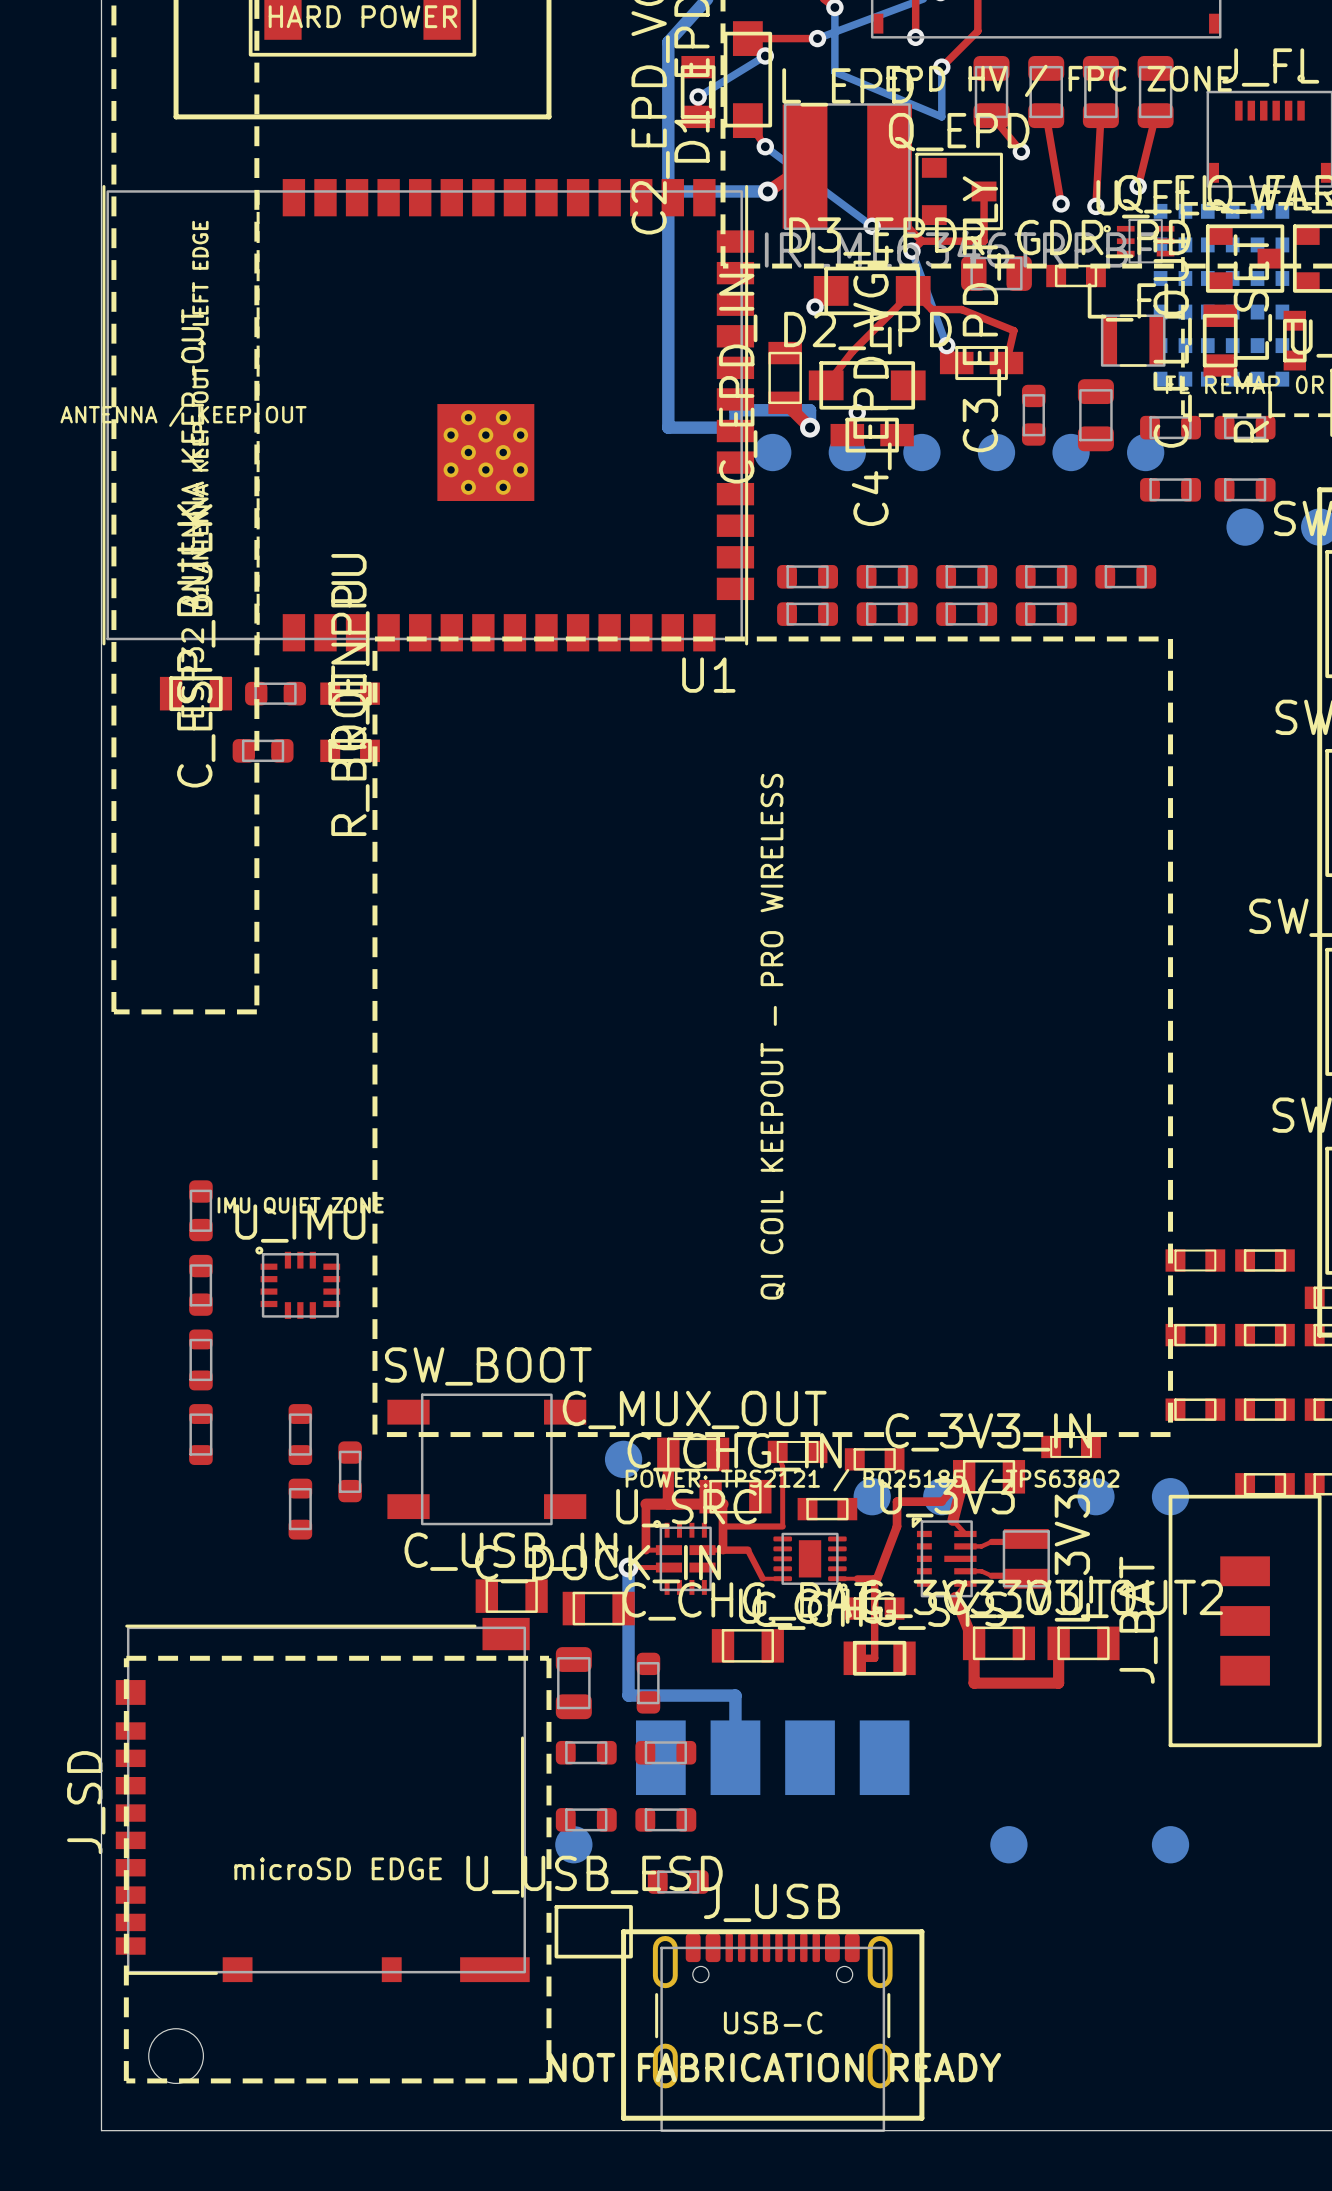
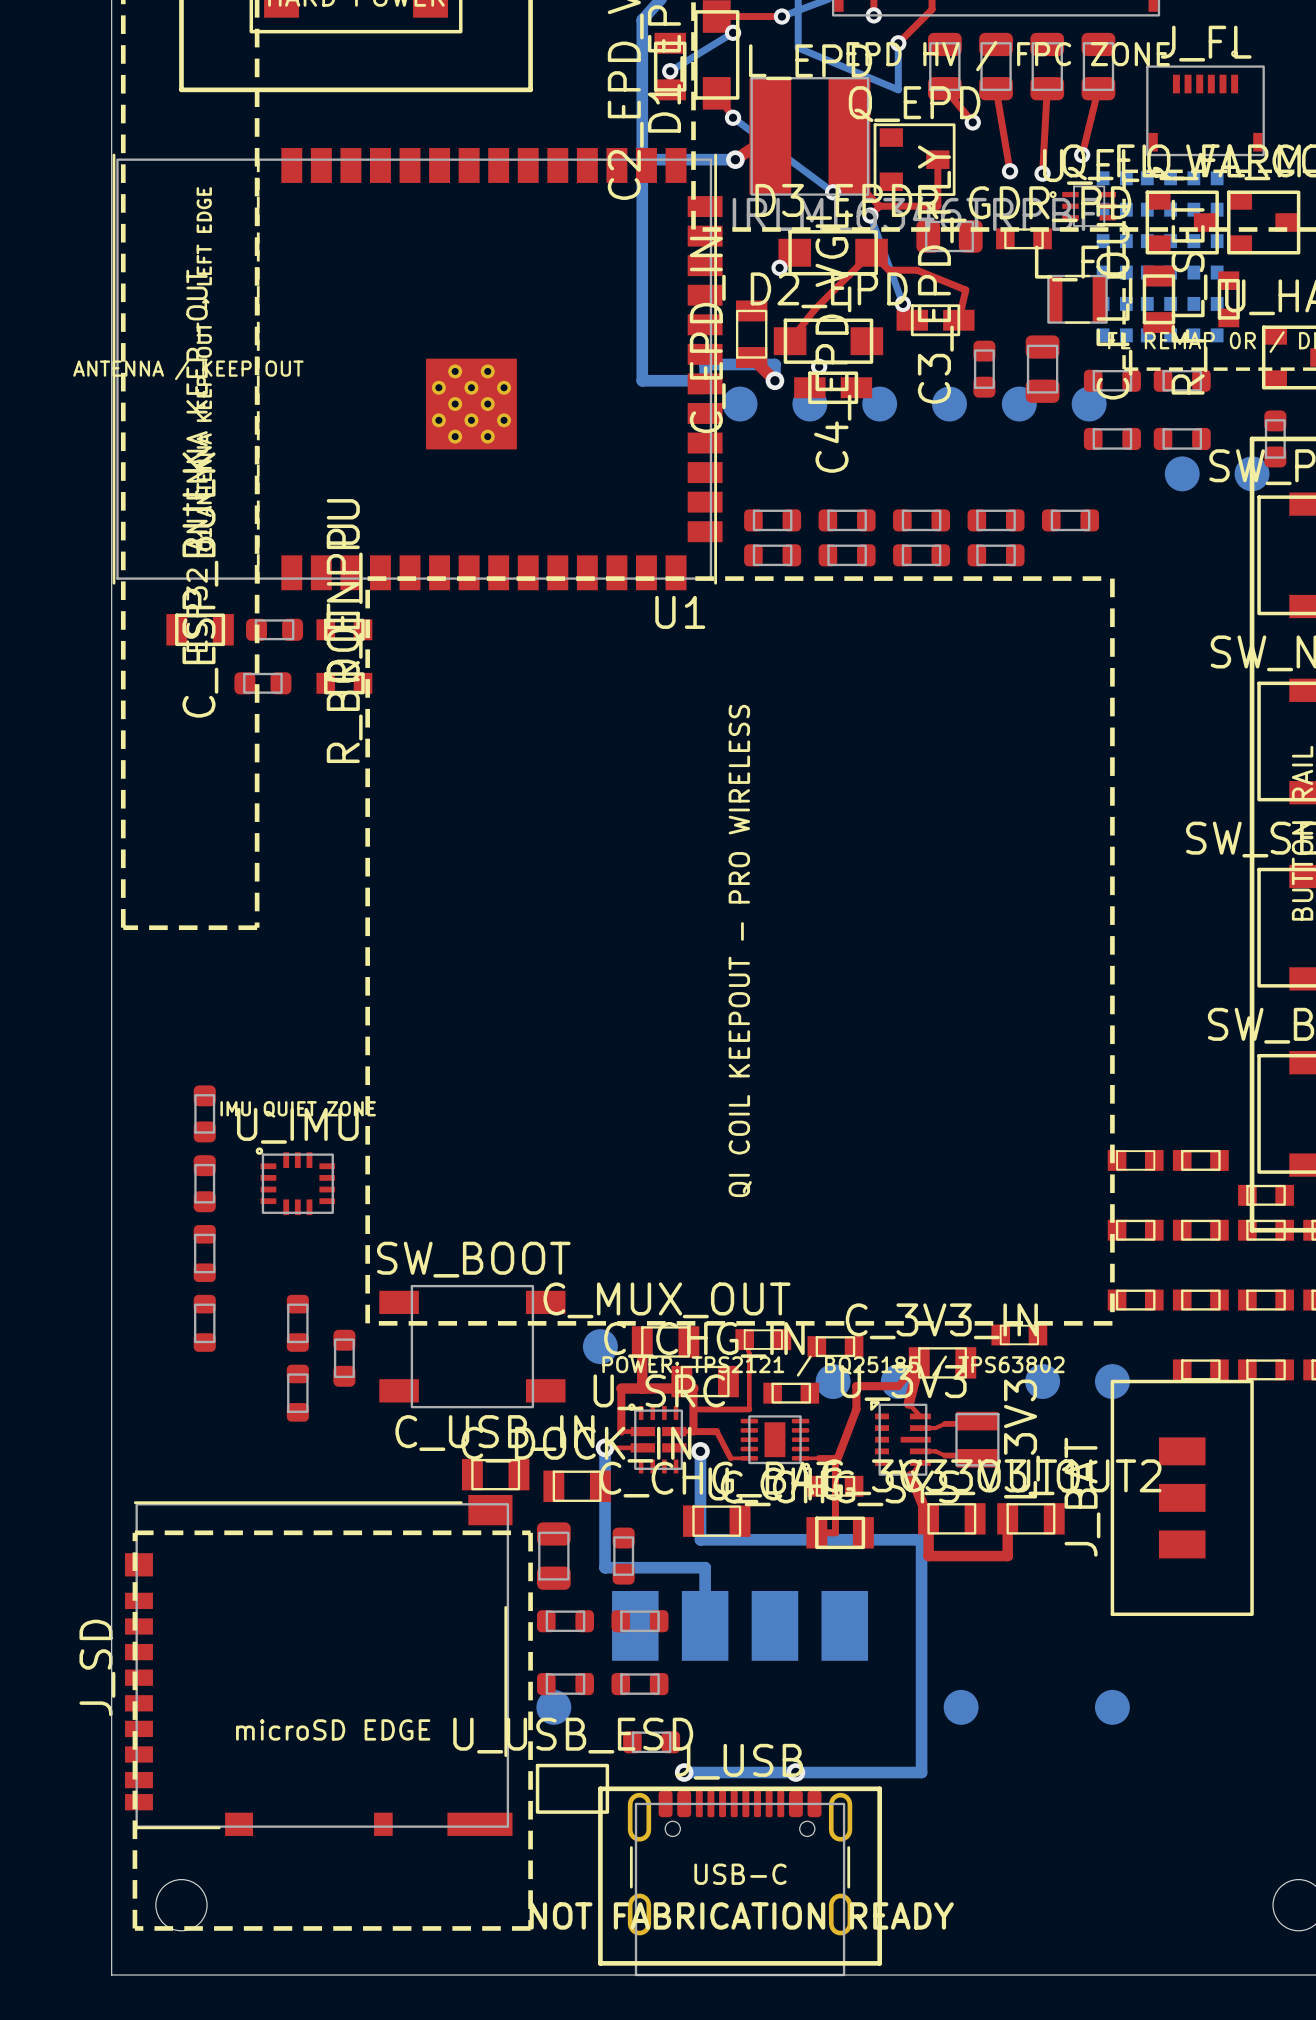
bottom track: none -> (700, 1451) (700, 1539) (921, 1539) (921, 1772) (684, 1772)
via: none -> (700, 1451)
via: none -> (684, 1772)
via: none -> (795, 1772)

